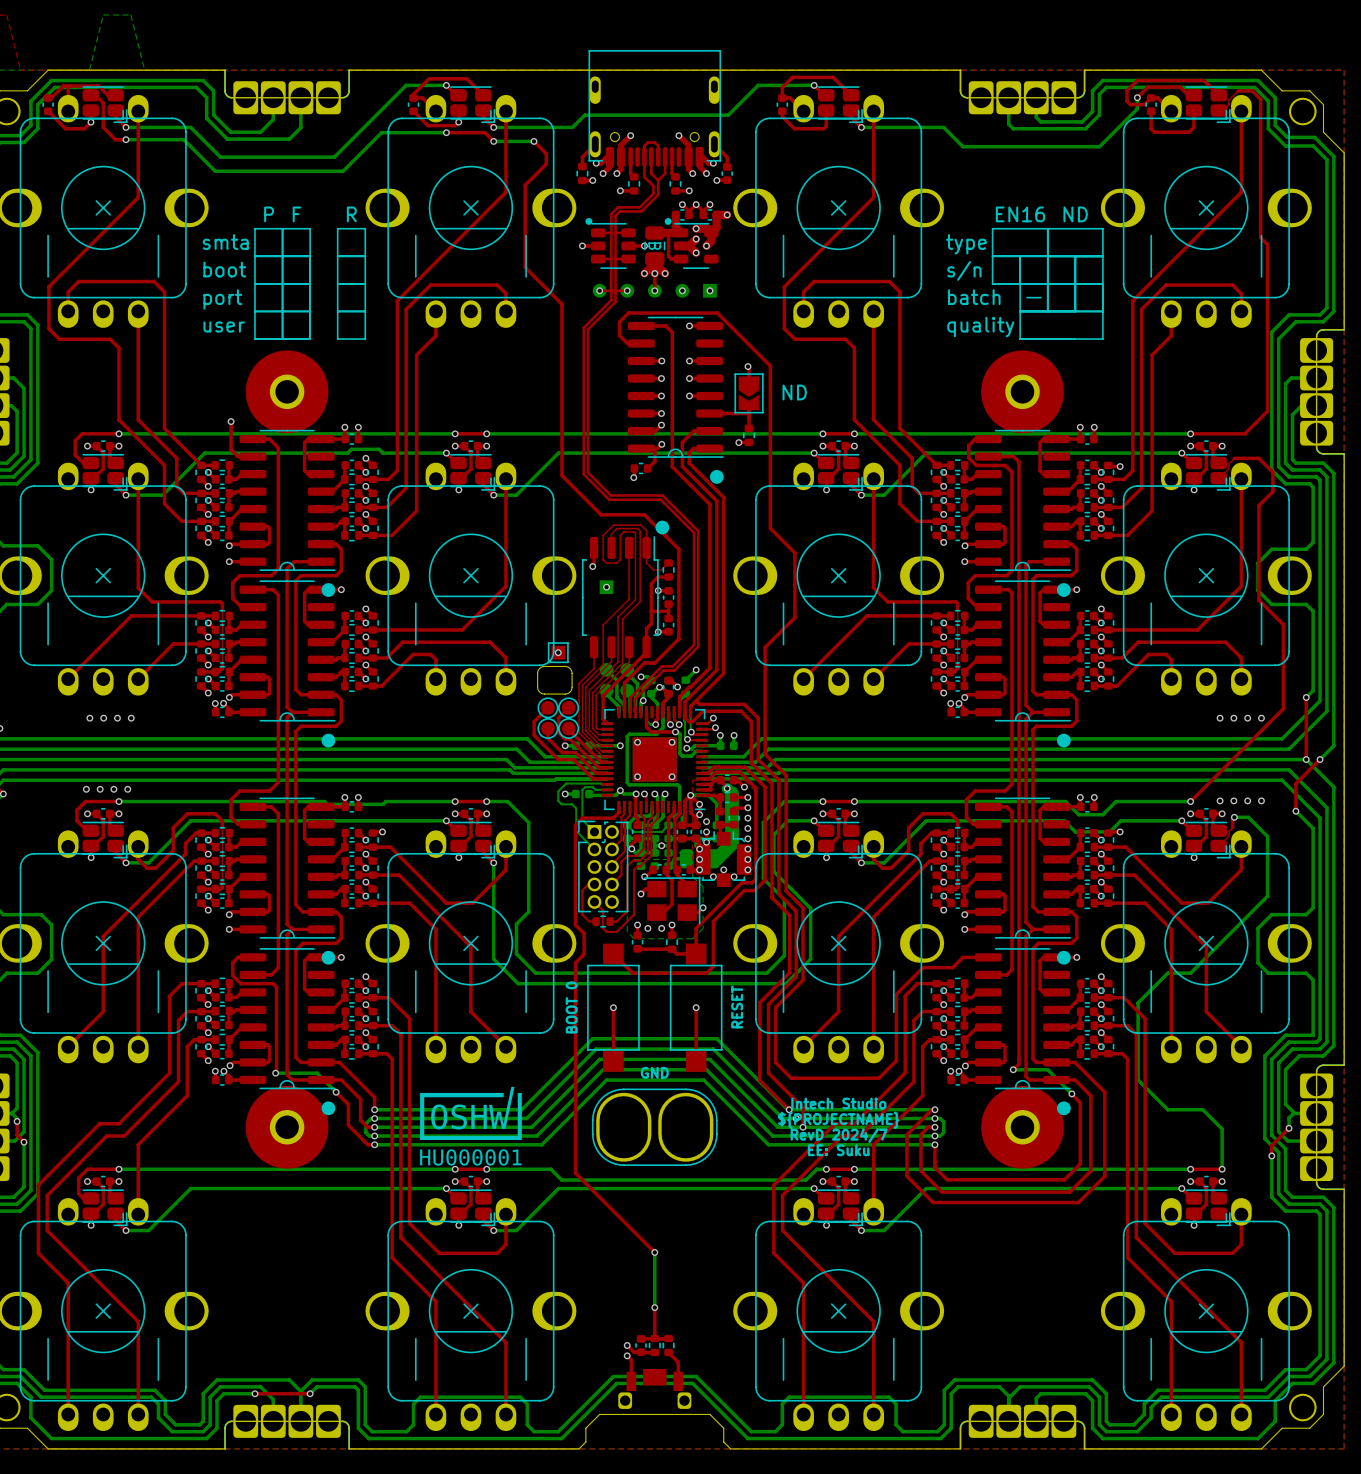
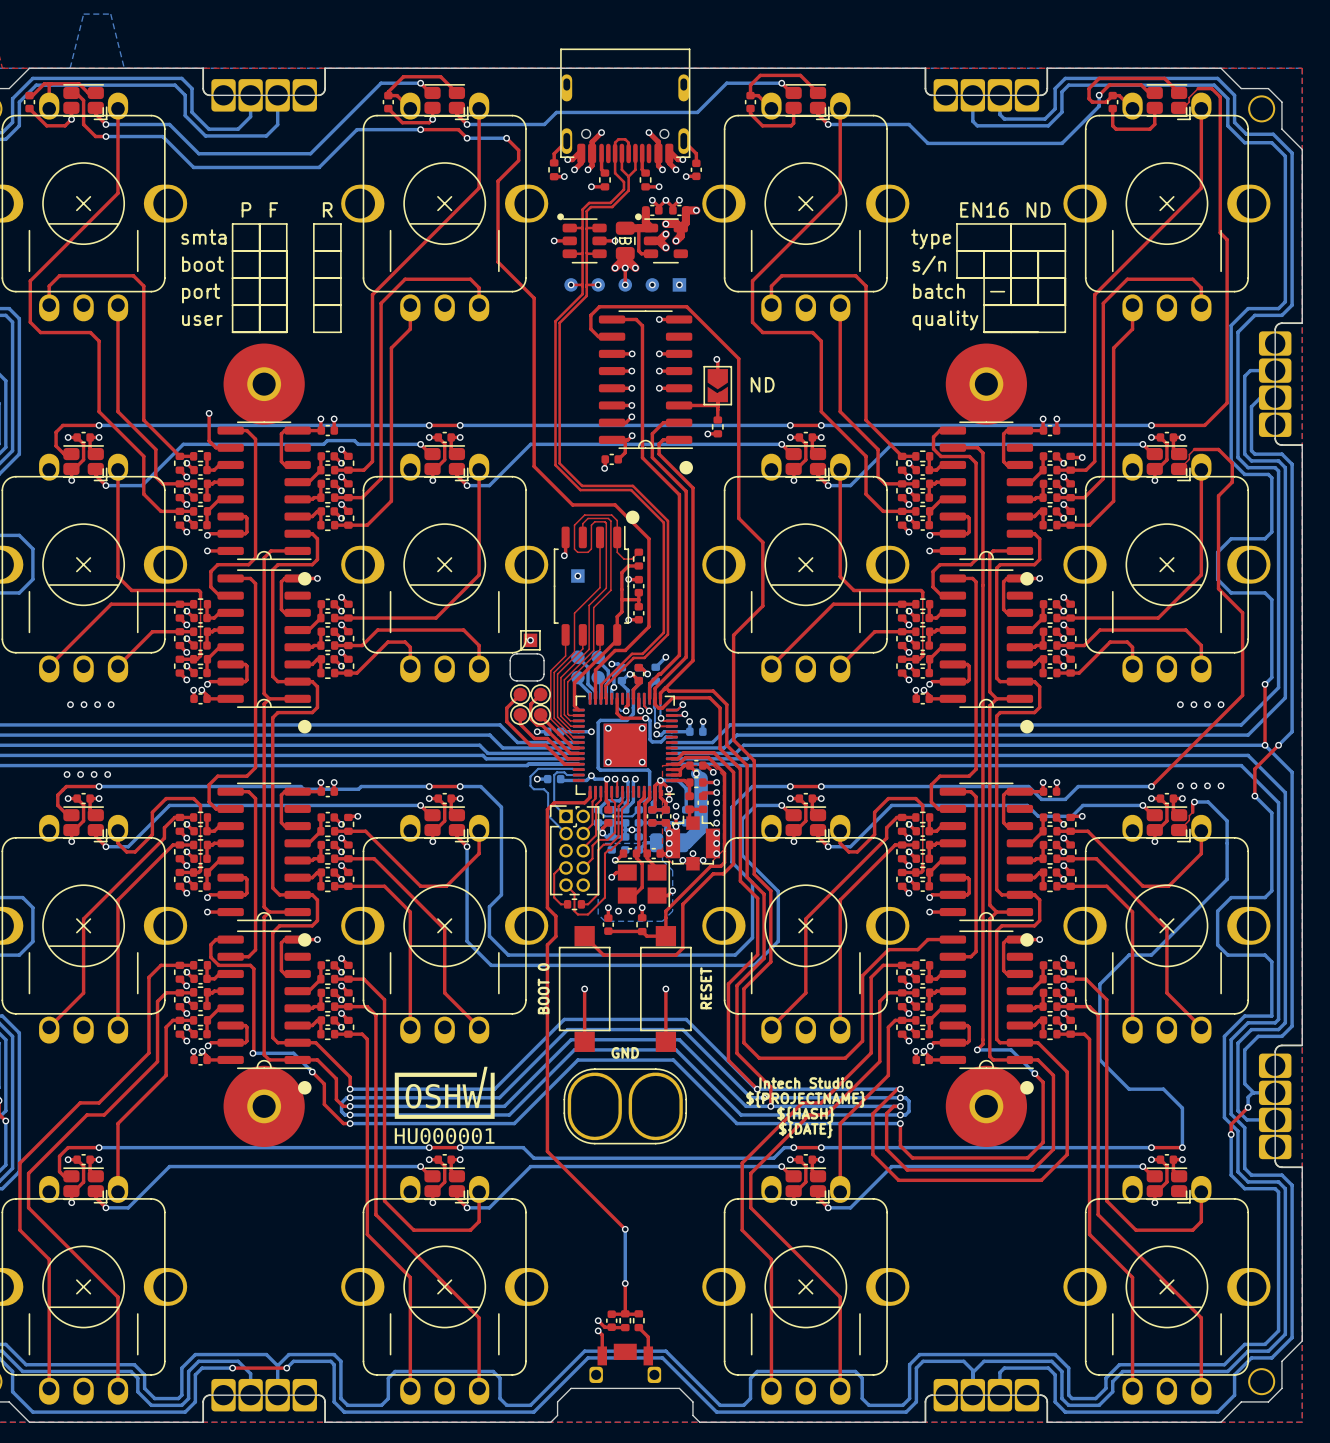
text: RevD 2024/7 (839, 1135) -> ${HASH} (805, 1114)
text: EE: Suku (838, 1150) -> ${DATE} (805, 1130)

